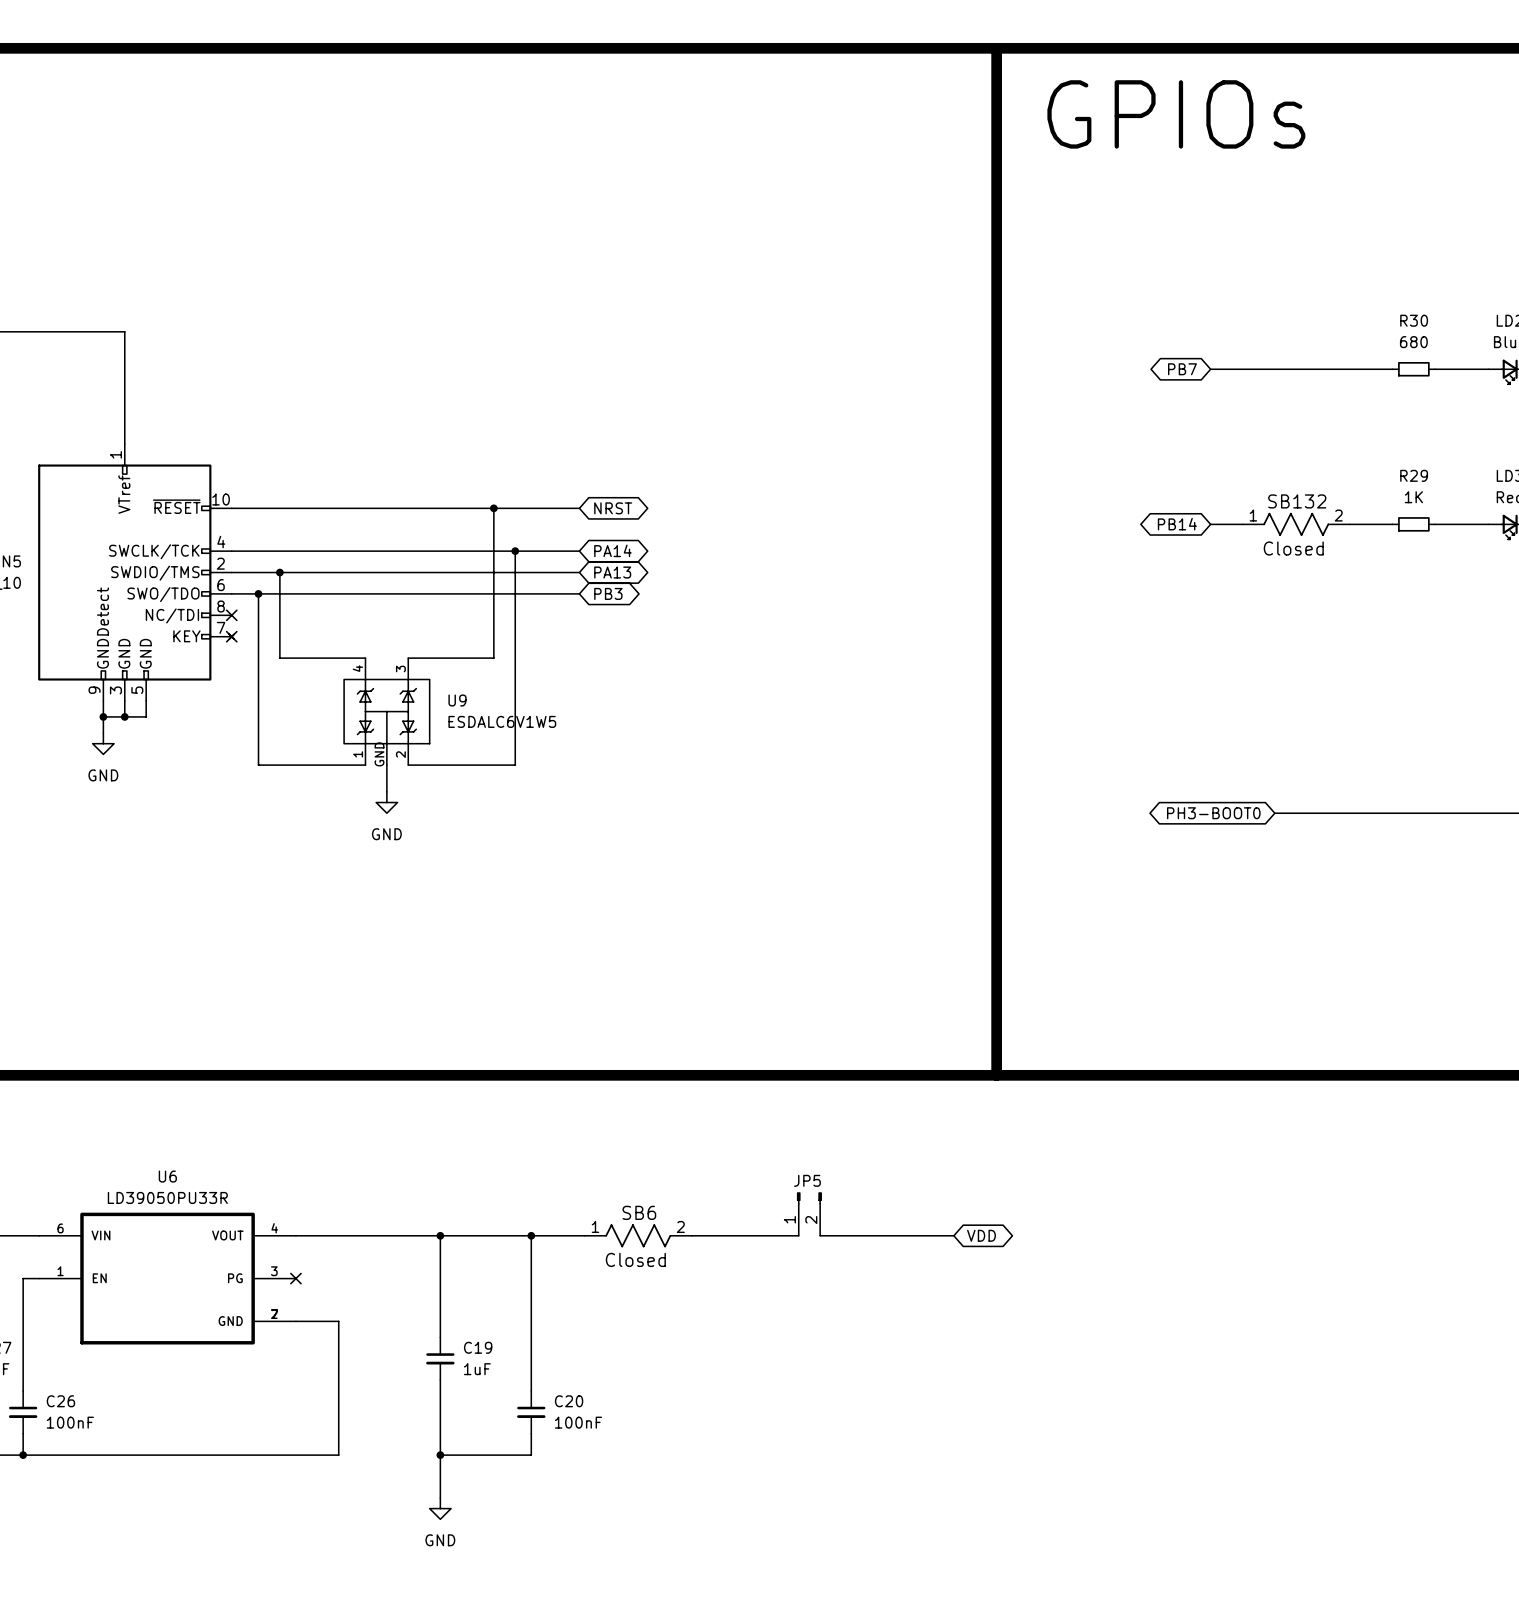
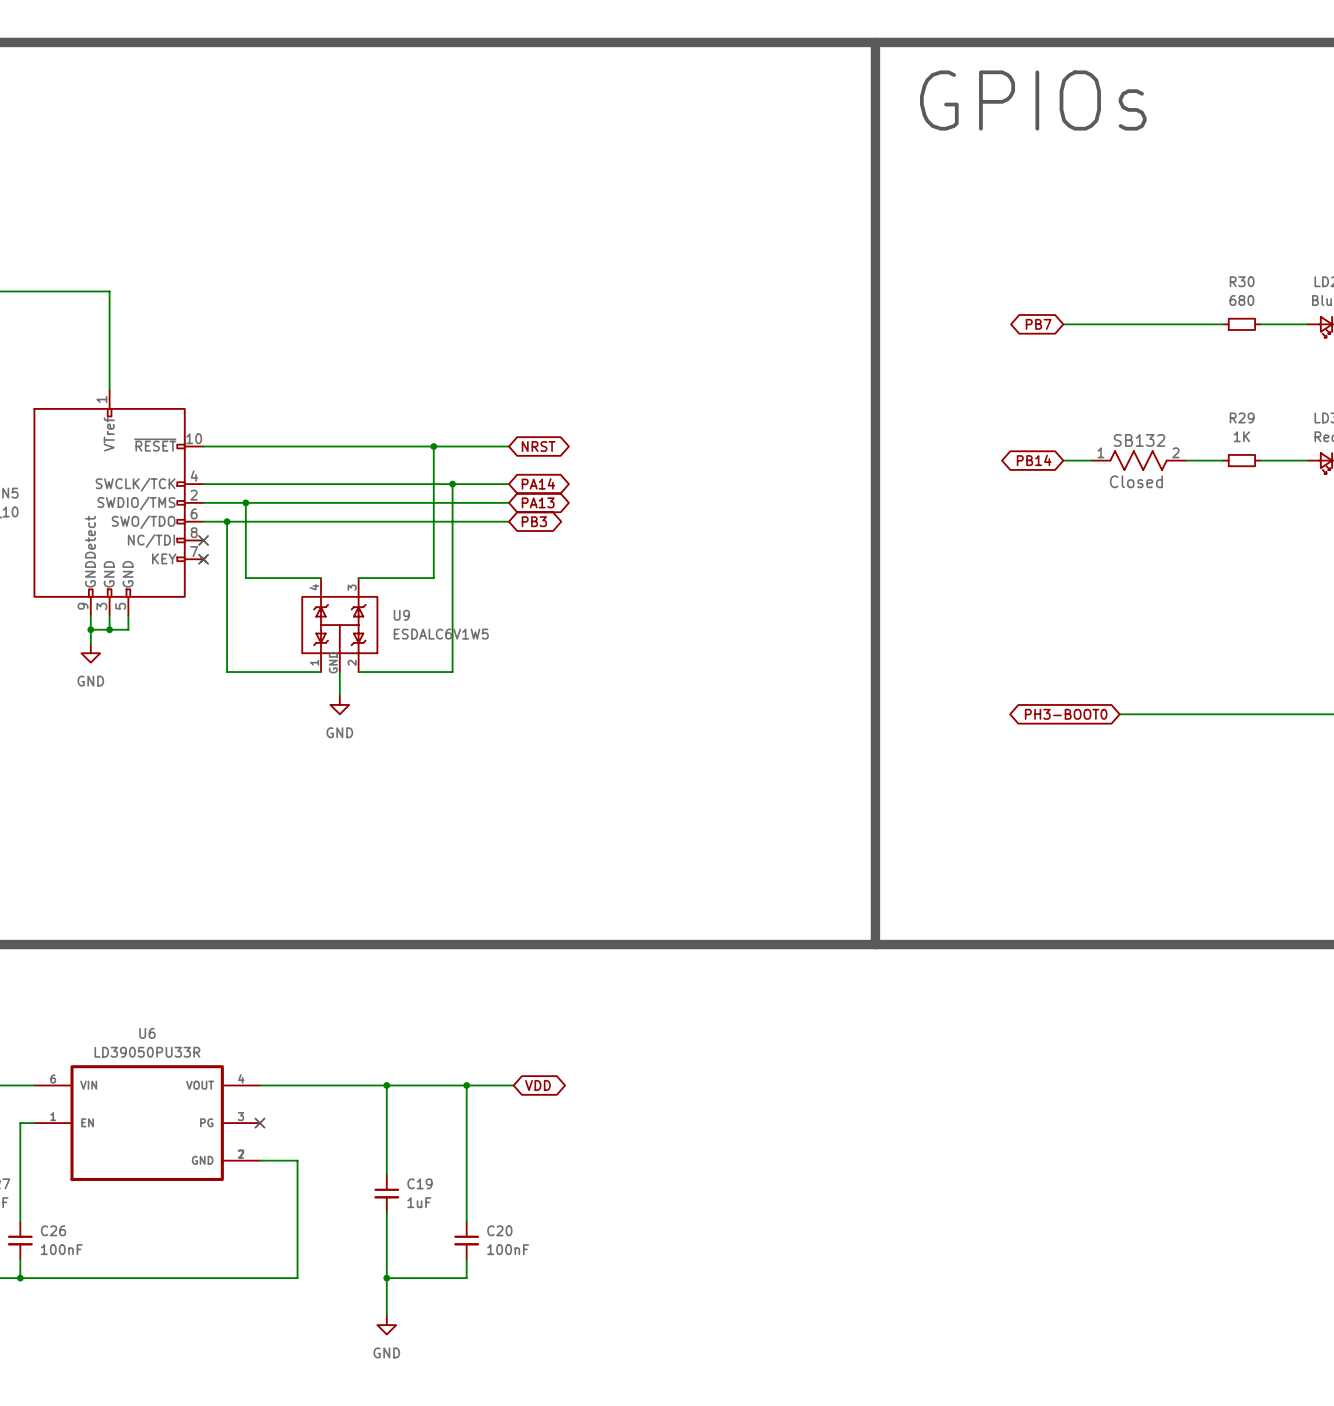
JP5: (809, 1214) -> none
global label: none -> VDD (537, 1085)
SB6: Closed (638, 1235) -> none
wire: (691, 1235) (798, 1235) -> none
wire: (820, 1235) (953, 1235) -> none
global label: VDD (981, 1235) -> none

